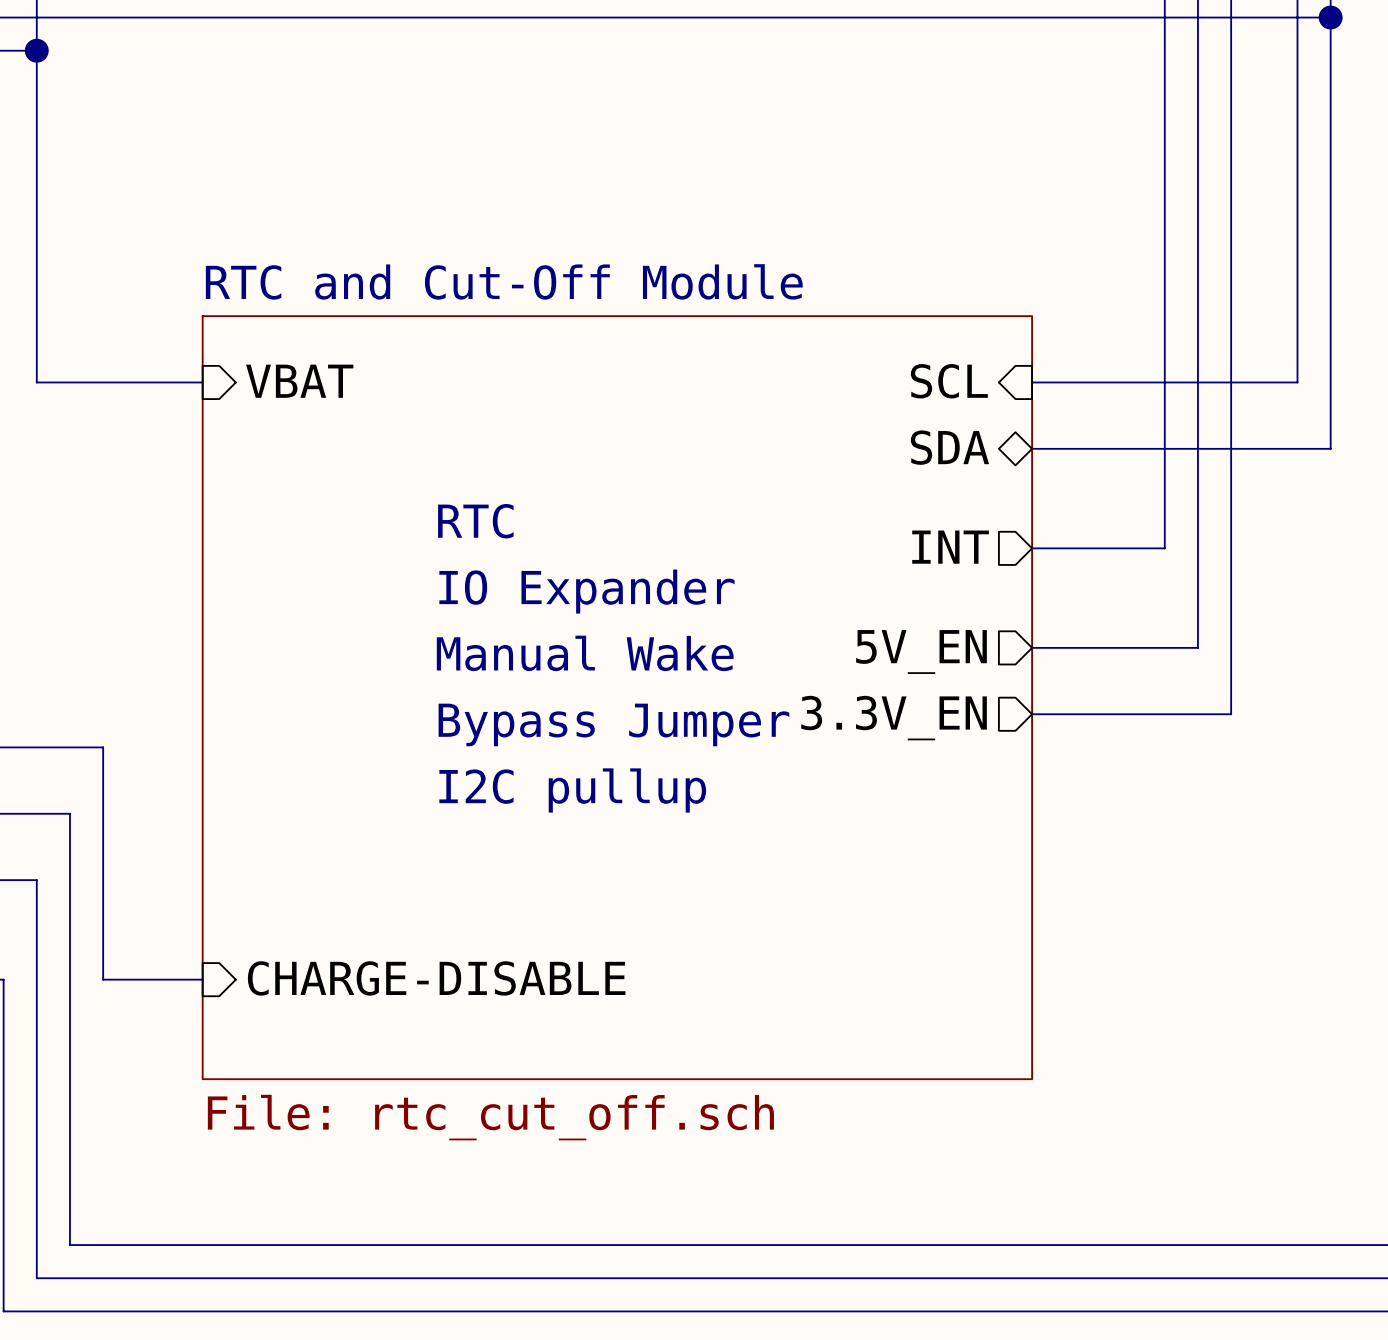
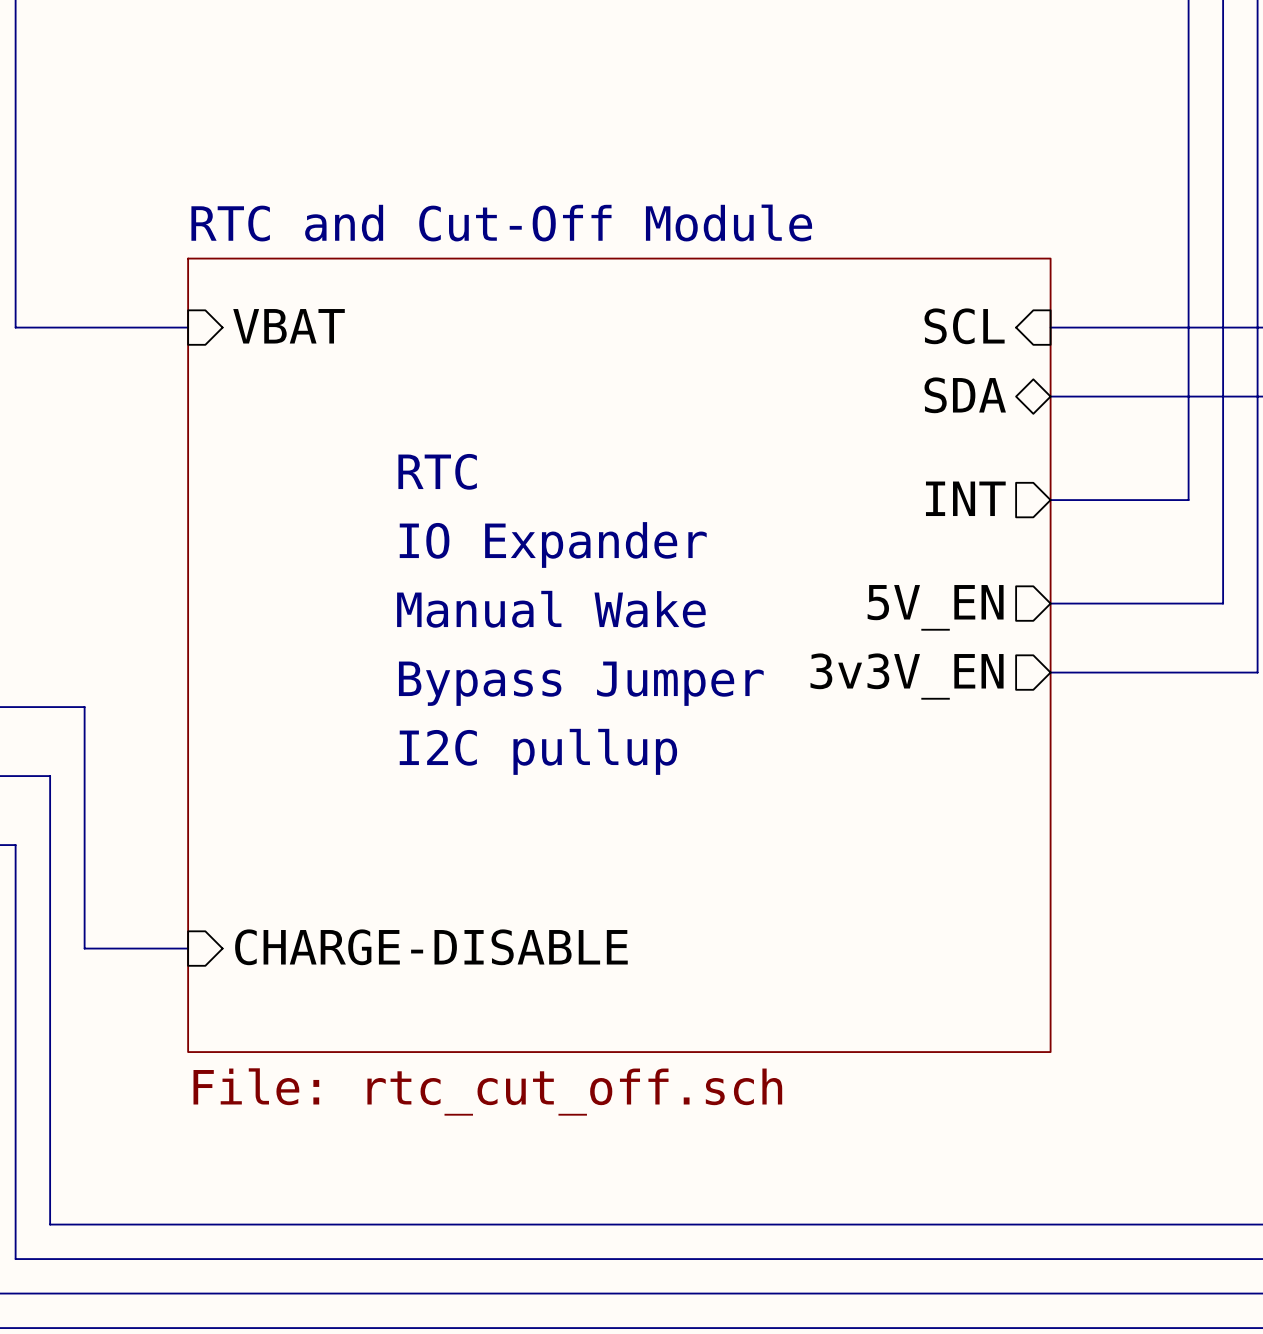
text position: RTC (475, 521) -> RTC (437, 471)
text position: IO Expander (586, 591) -> IO Expander (553, 544)
text position: Manual Wake (585, 653) -> Manual Wake (551, 609)
sheet pin: 3.3V_EN (894, 718) -> 3v3V_EN (907, 676)
text position: Bypass Jumper (613, 724) -> Bypass Jumper (581, 683)
text position: I2C pullup (572, 790) -> I2C pullup (538, 751)

